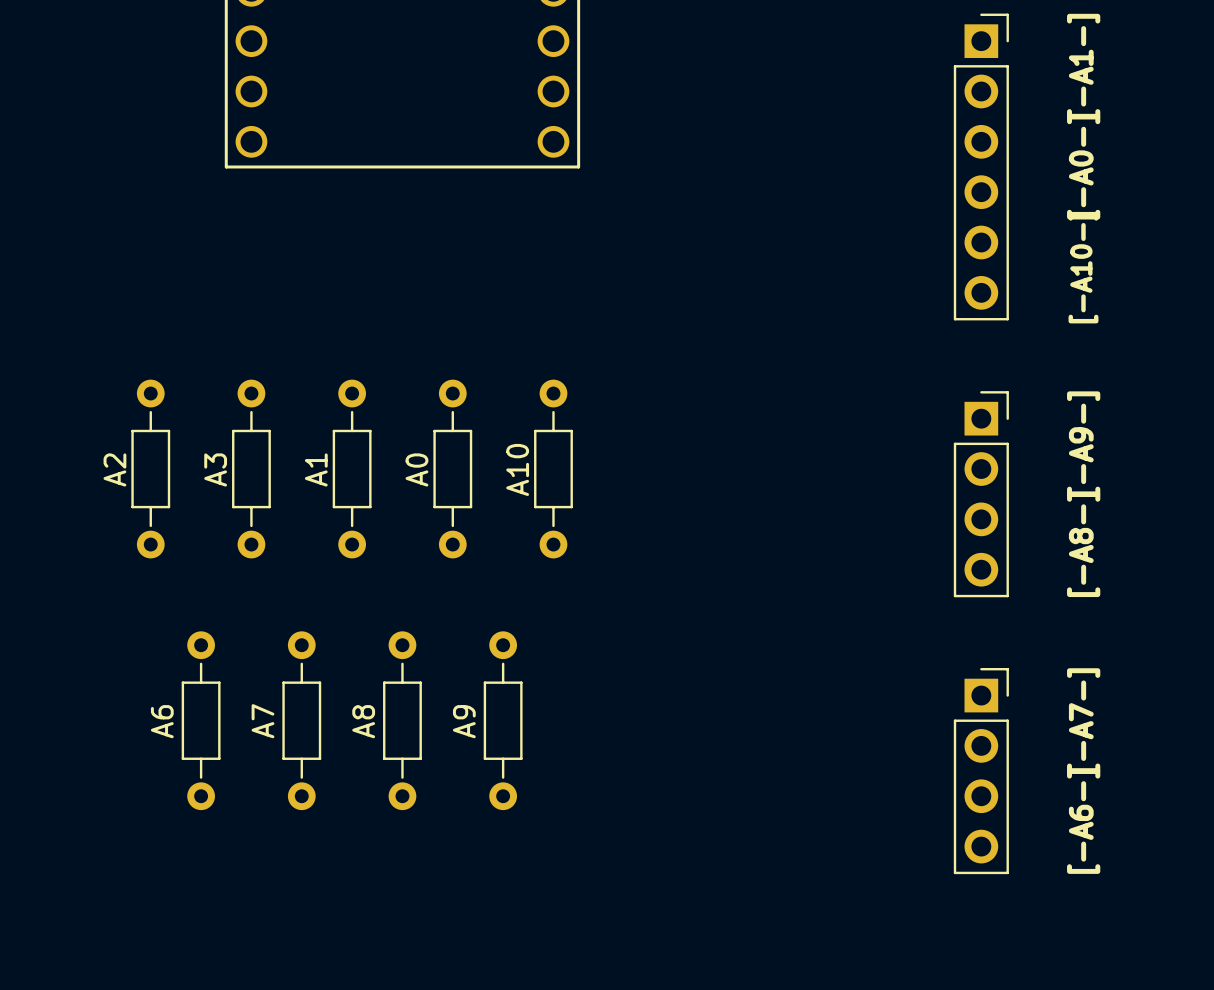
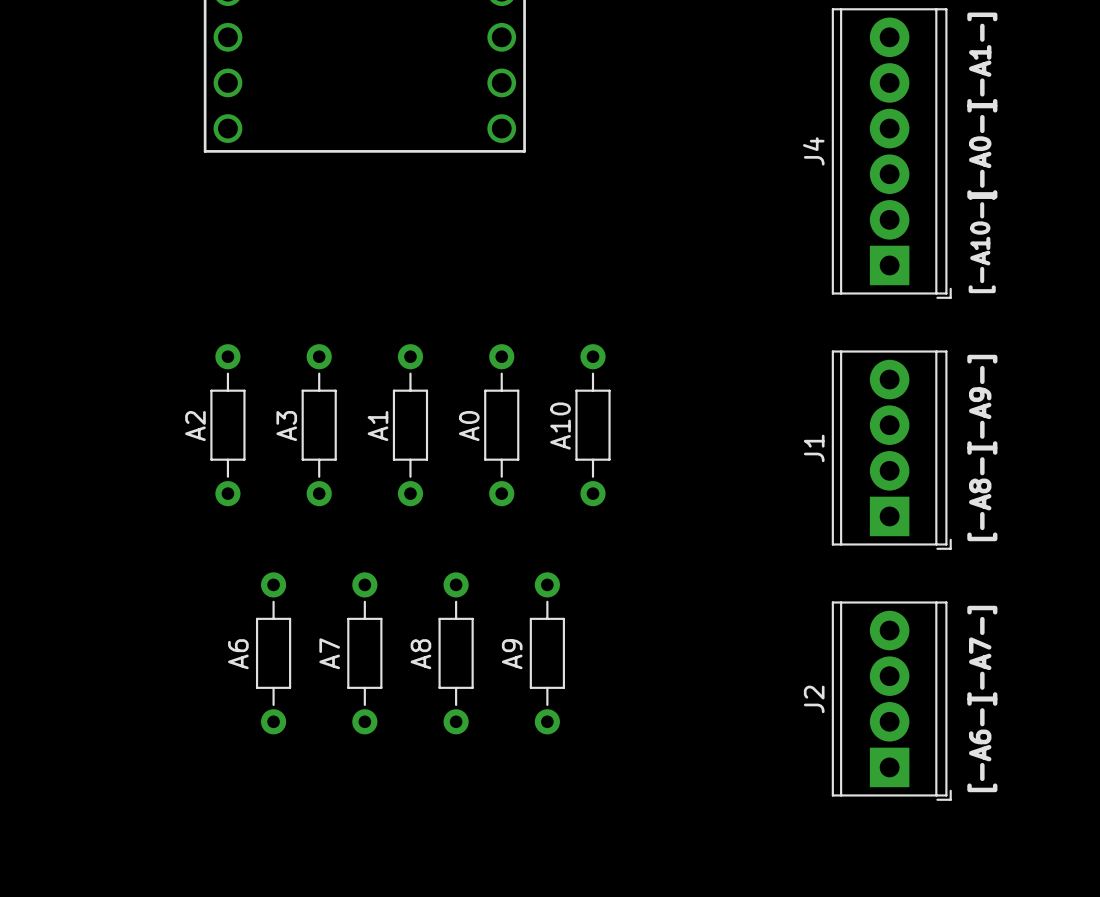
part: (981, 166) -> none
J4: none -> (891, 153)
A2: (150, 469) -> none
A3 name: A3 (215, 469) -> A2 (195, 426)
A1 name: A1 (316, 469) -> A3 (286, 426)
A0 name: A0 (416, 469) -> A1 (378, 426)
A10 name: A10 (517, 469) -> A0 (469, 426)
A10: none -> (593, 425)
part: (981, 494) -> none
J1: none -> (891, 450)
A6: (201, 720) -> none
A9: none -> (547, 653)
A7 name: A7 (262, 721) -> A6 (238, 654)
A8 name: A8 (363, 721) -> A7 (329, 653)
A9 name: A9 (464, 721) -> A8 (420, 654)
part: (981, 771) -> none
J2: none -> (891, 701)

